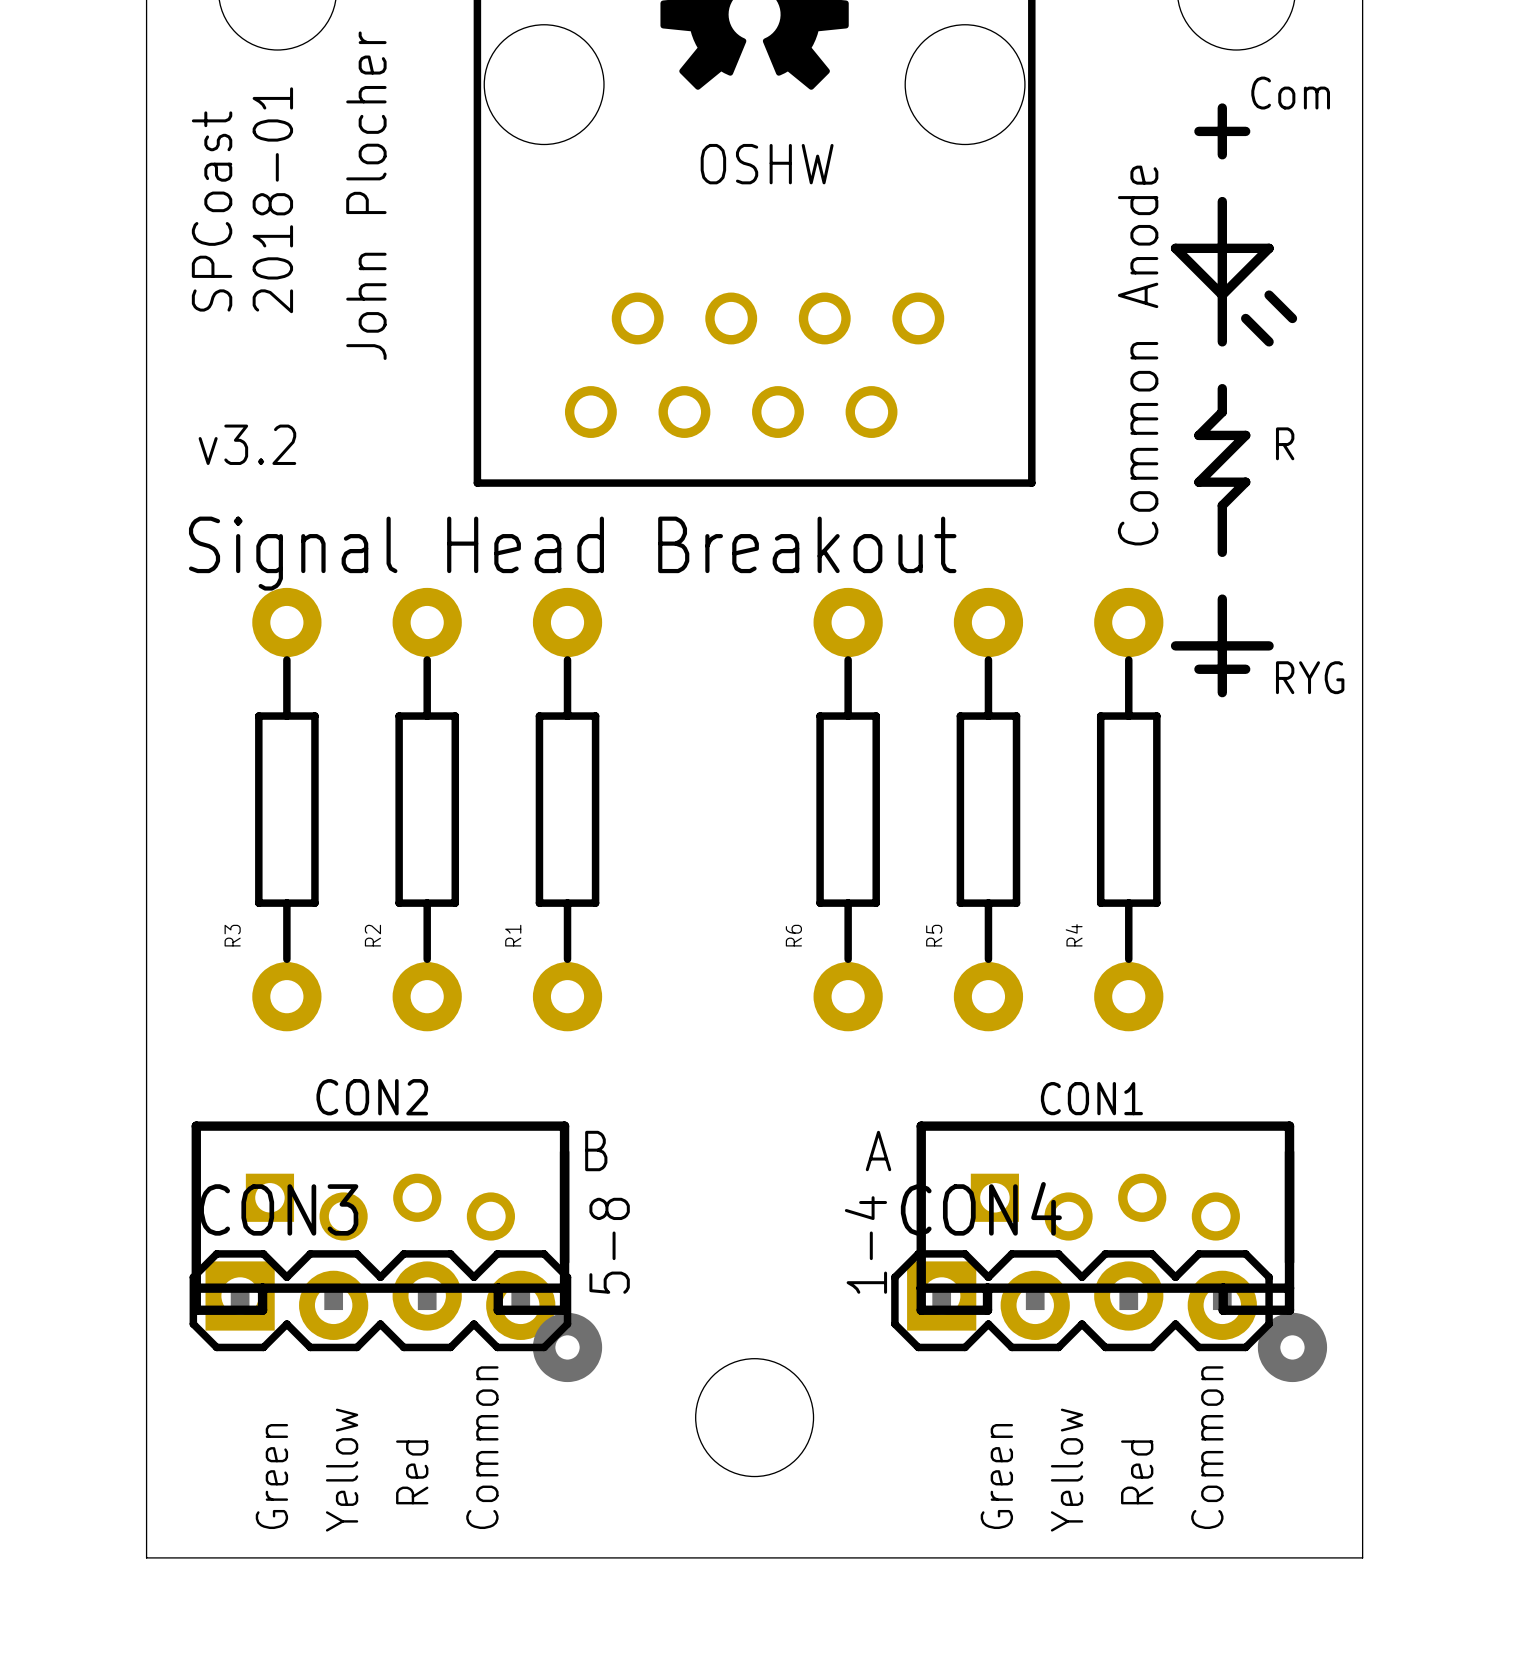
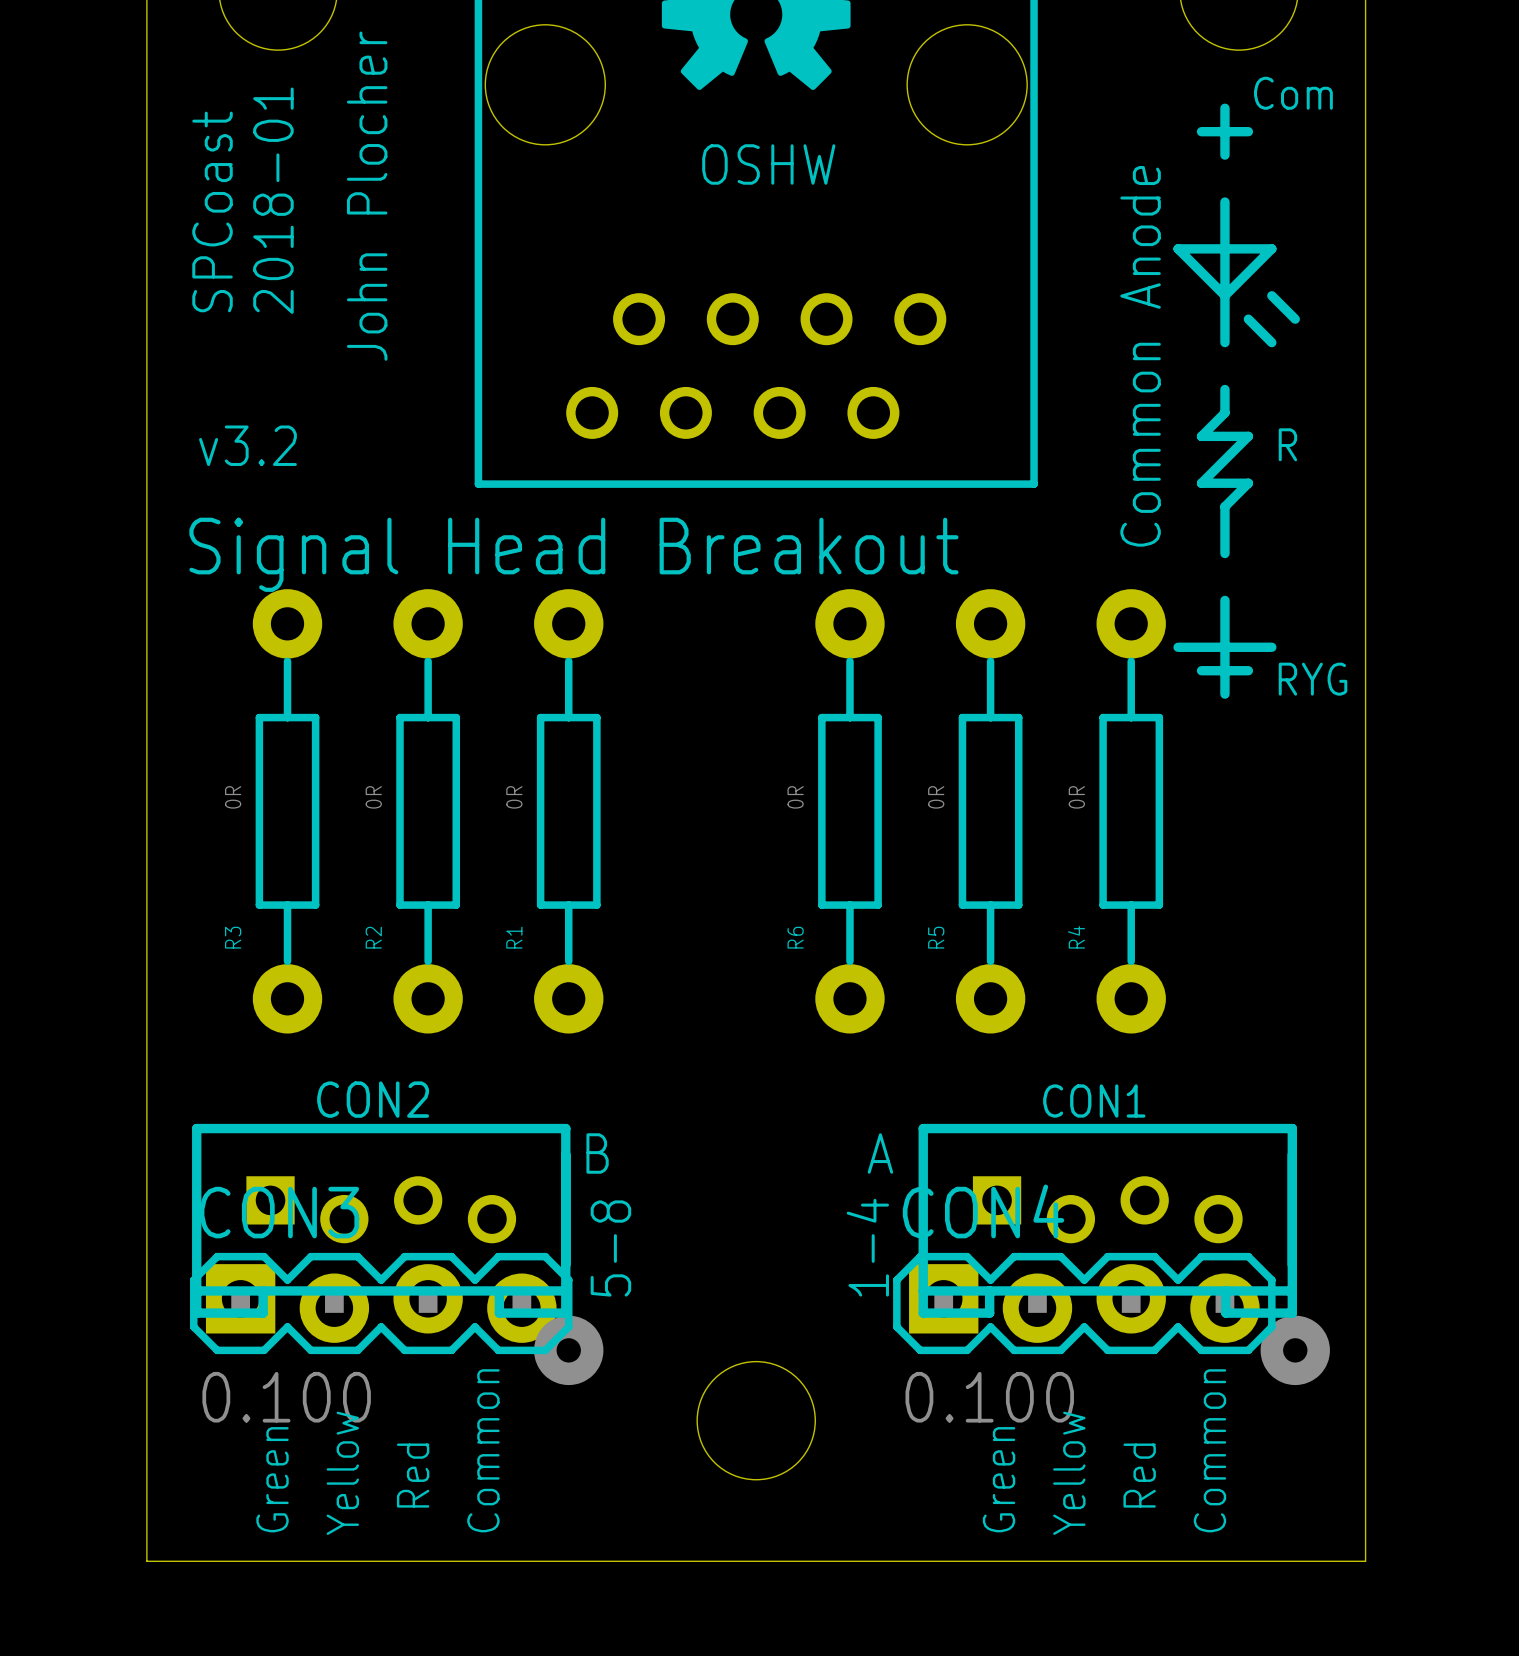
R3 value: none -> 0R (233, 797)
R2 value: none -> 0R (373, 797)
R1 value: none -> 0R (514, 797)
R6 value: none -> 0R (795, 797)
R5 value: none -> 0R (936, 797)
R4 value: none -> 0R (1076, 797)
CON3 value: none -> 0.100 (286, 1397)
CON4 value: none -> 0.100 (989, 1397)

